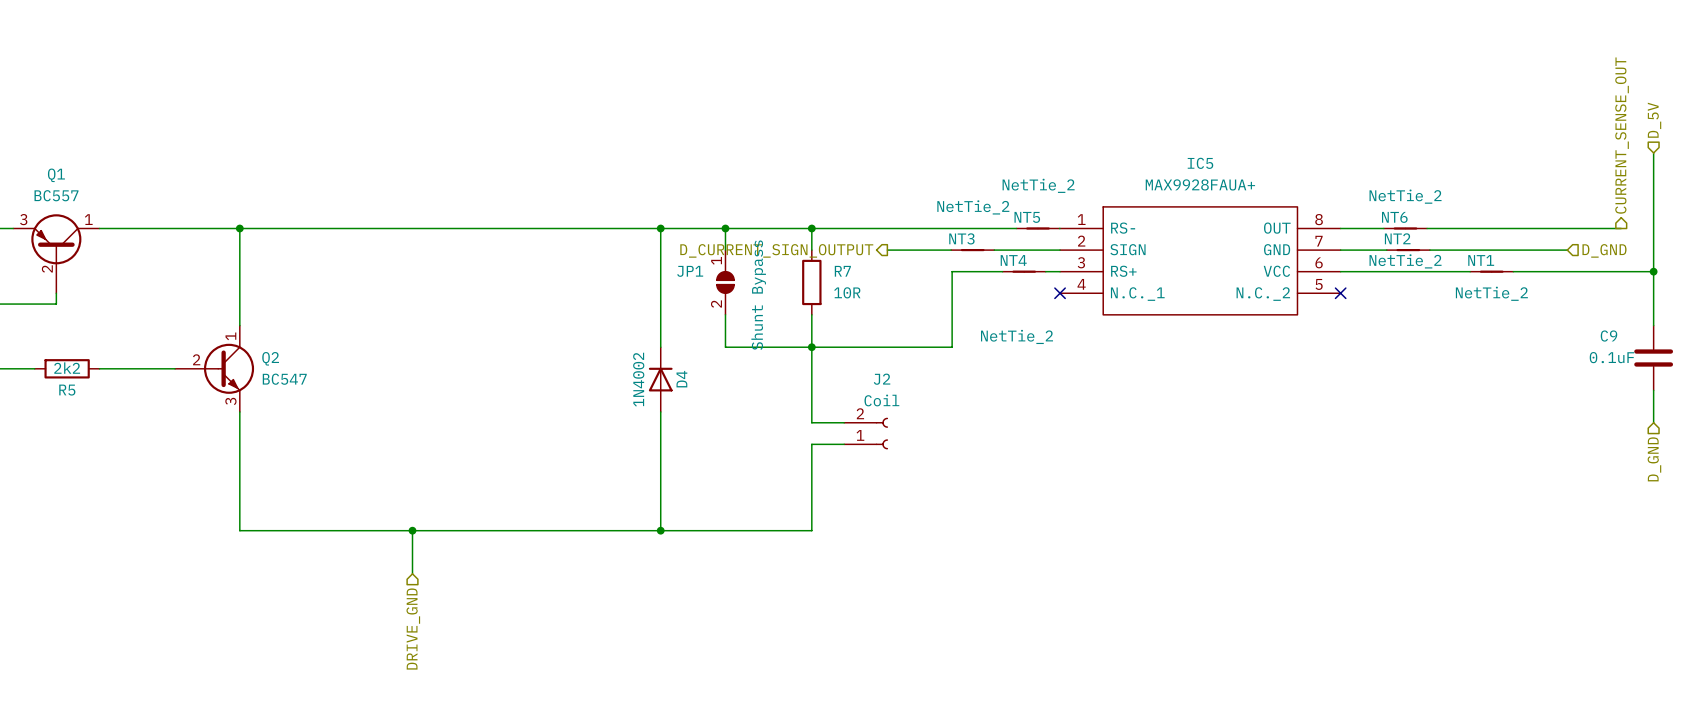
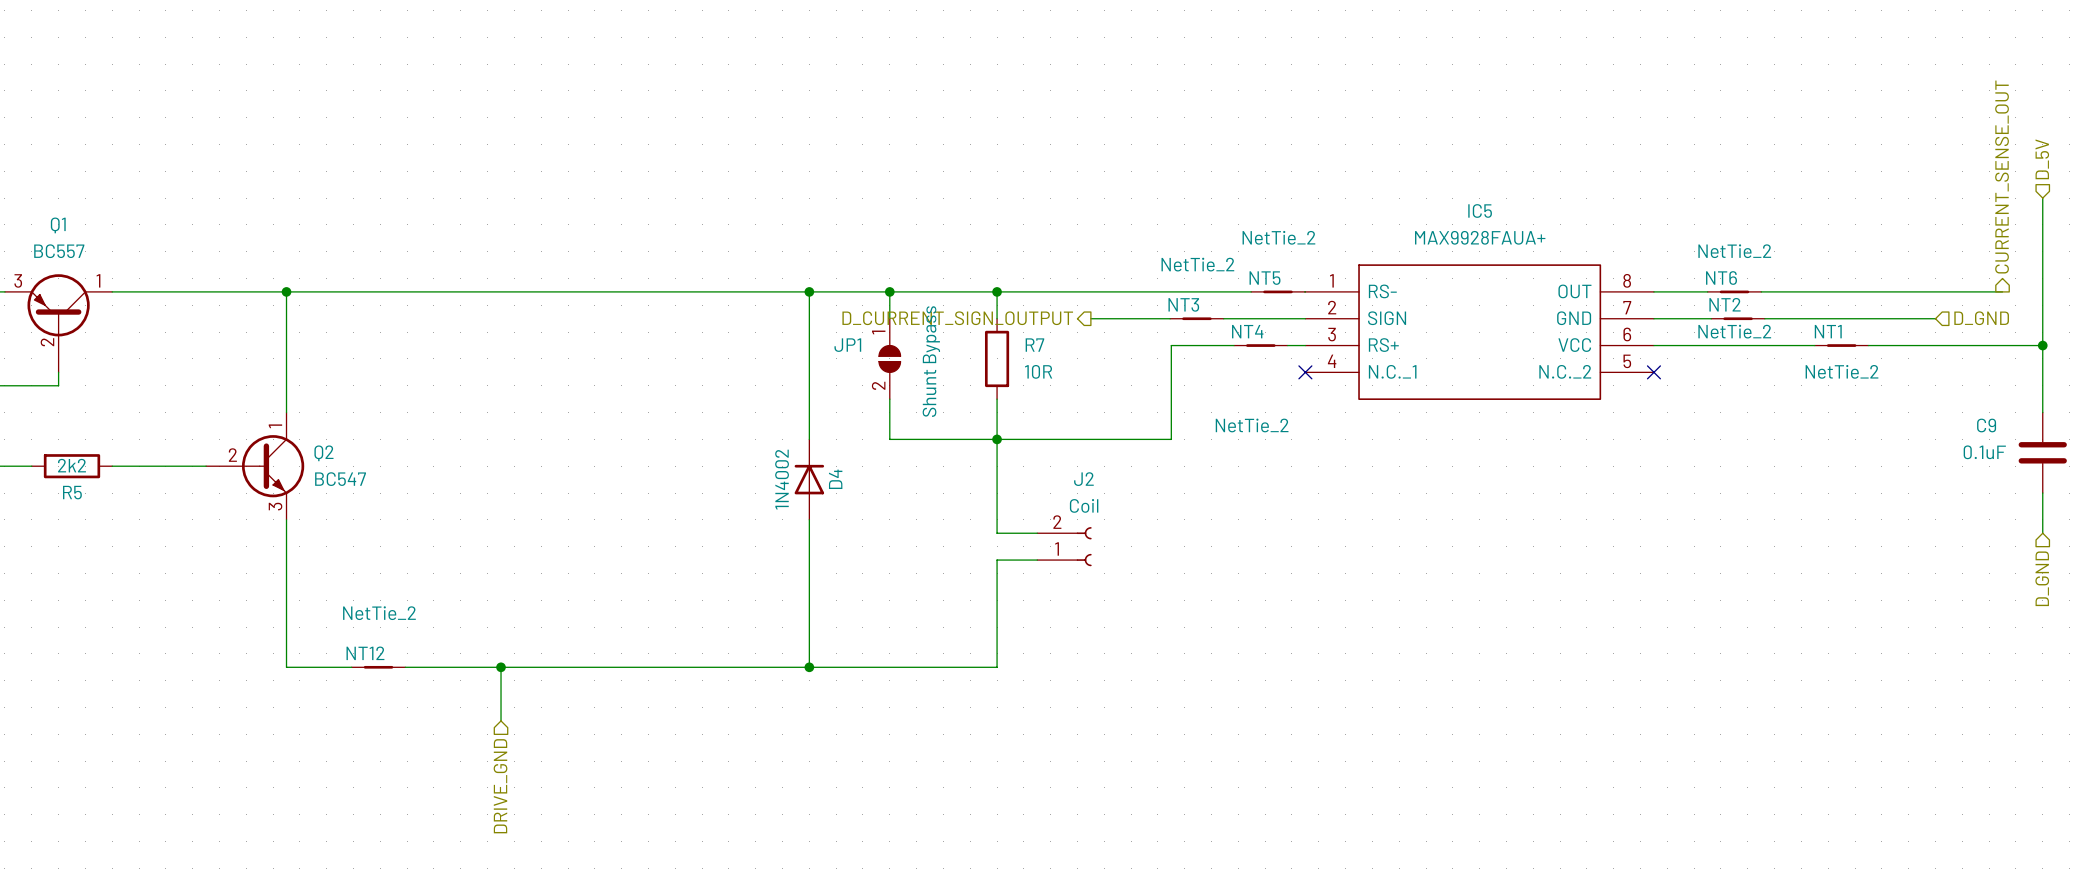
NT12: none -> NetTie_2 (378, 667)

